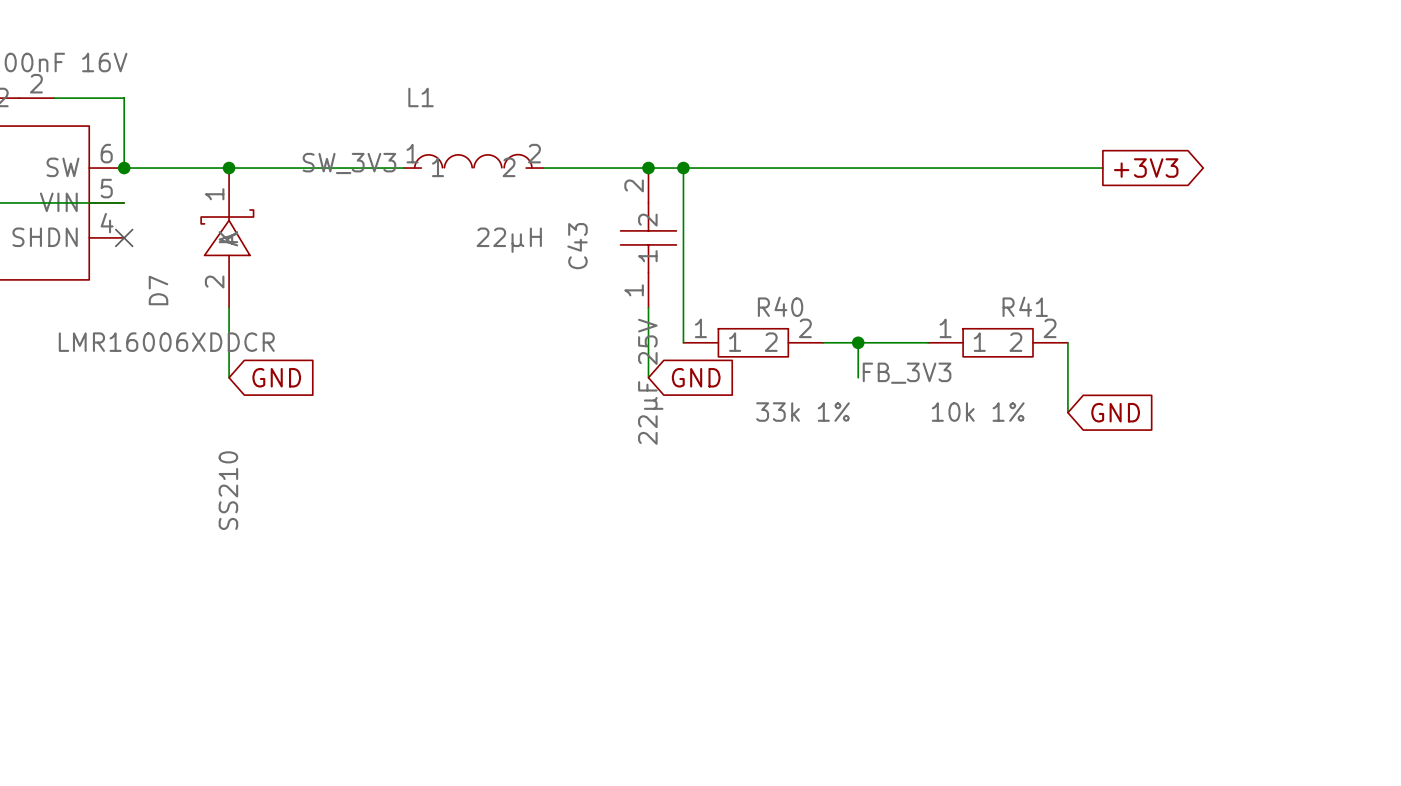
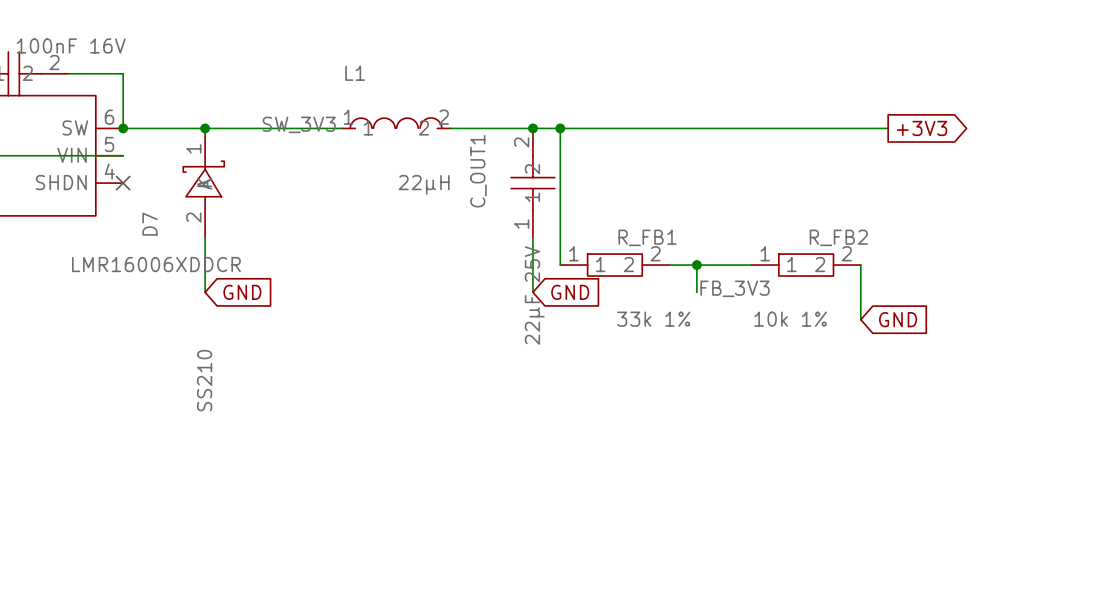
C43 name: C43 (577, 246) -> C_OUT1 (478, 171)
R40 name: R40 (780, 306) -> R_FB1 (647, 237)
R41 name: R41 (1025, 306) -> R_FB2 (838, 237)

